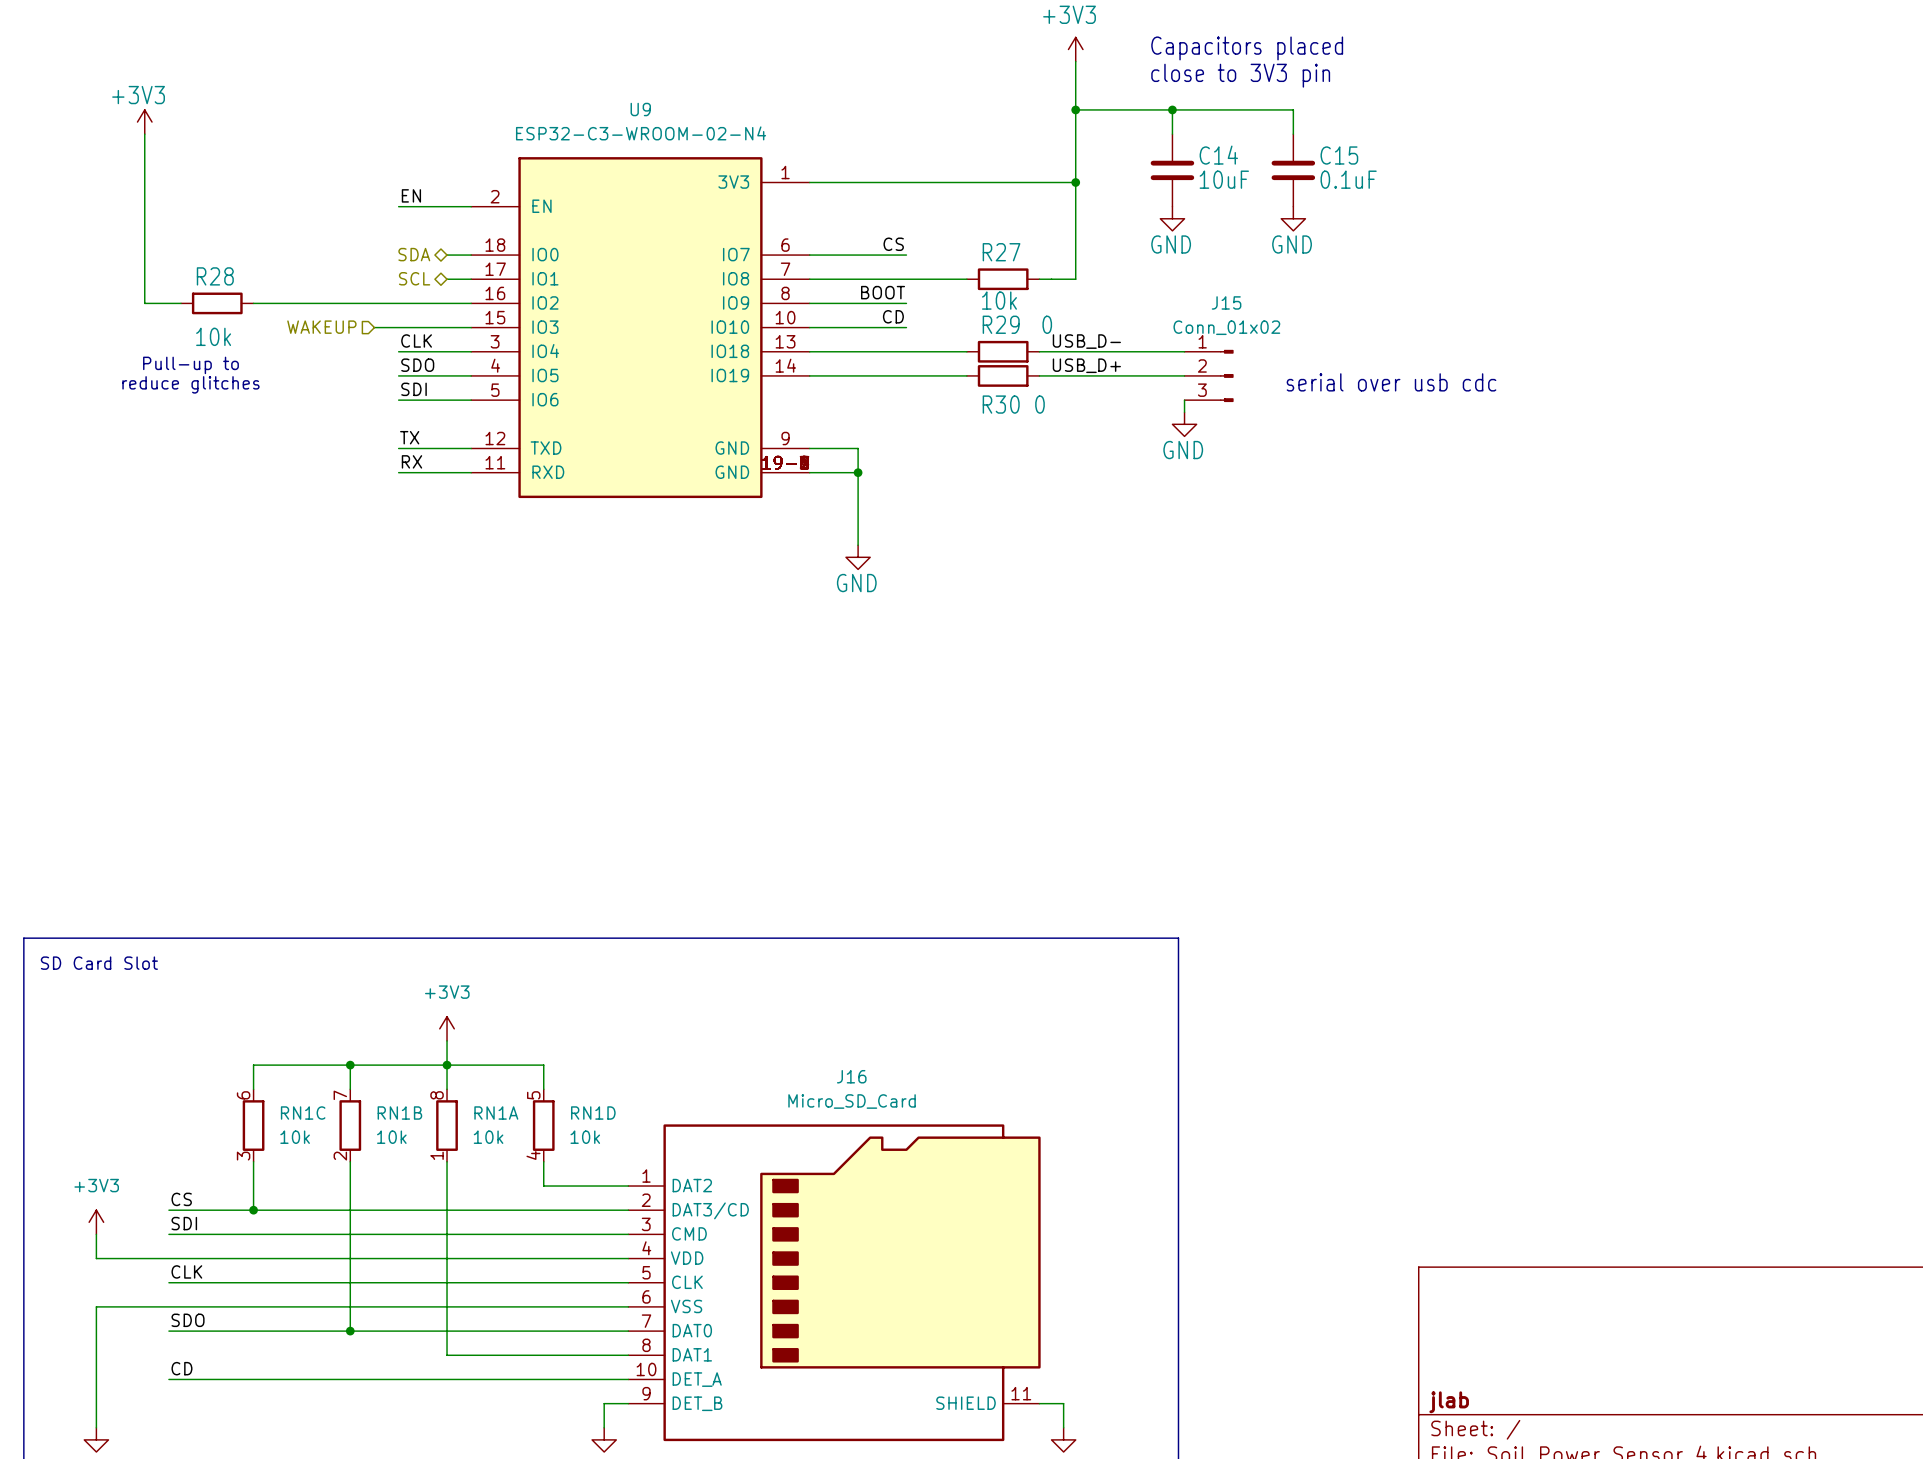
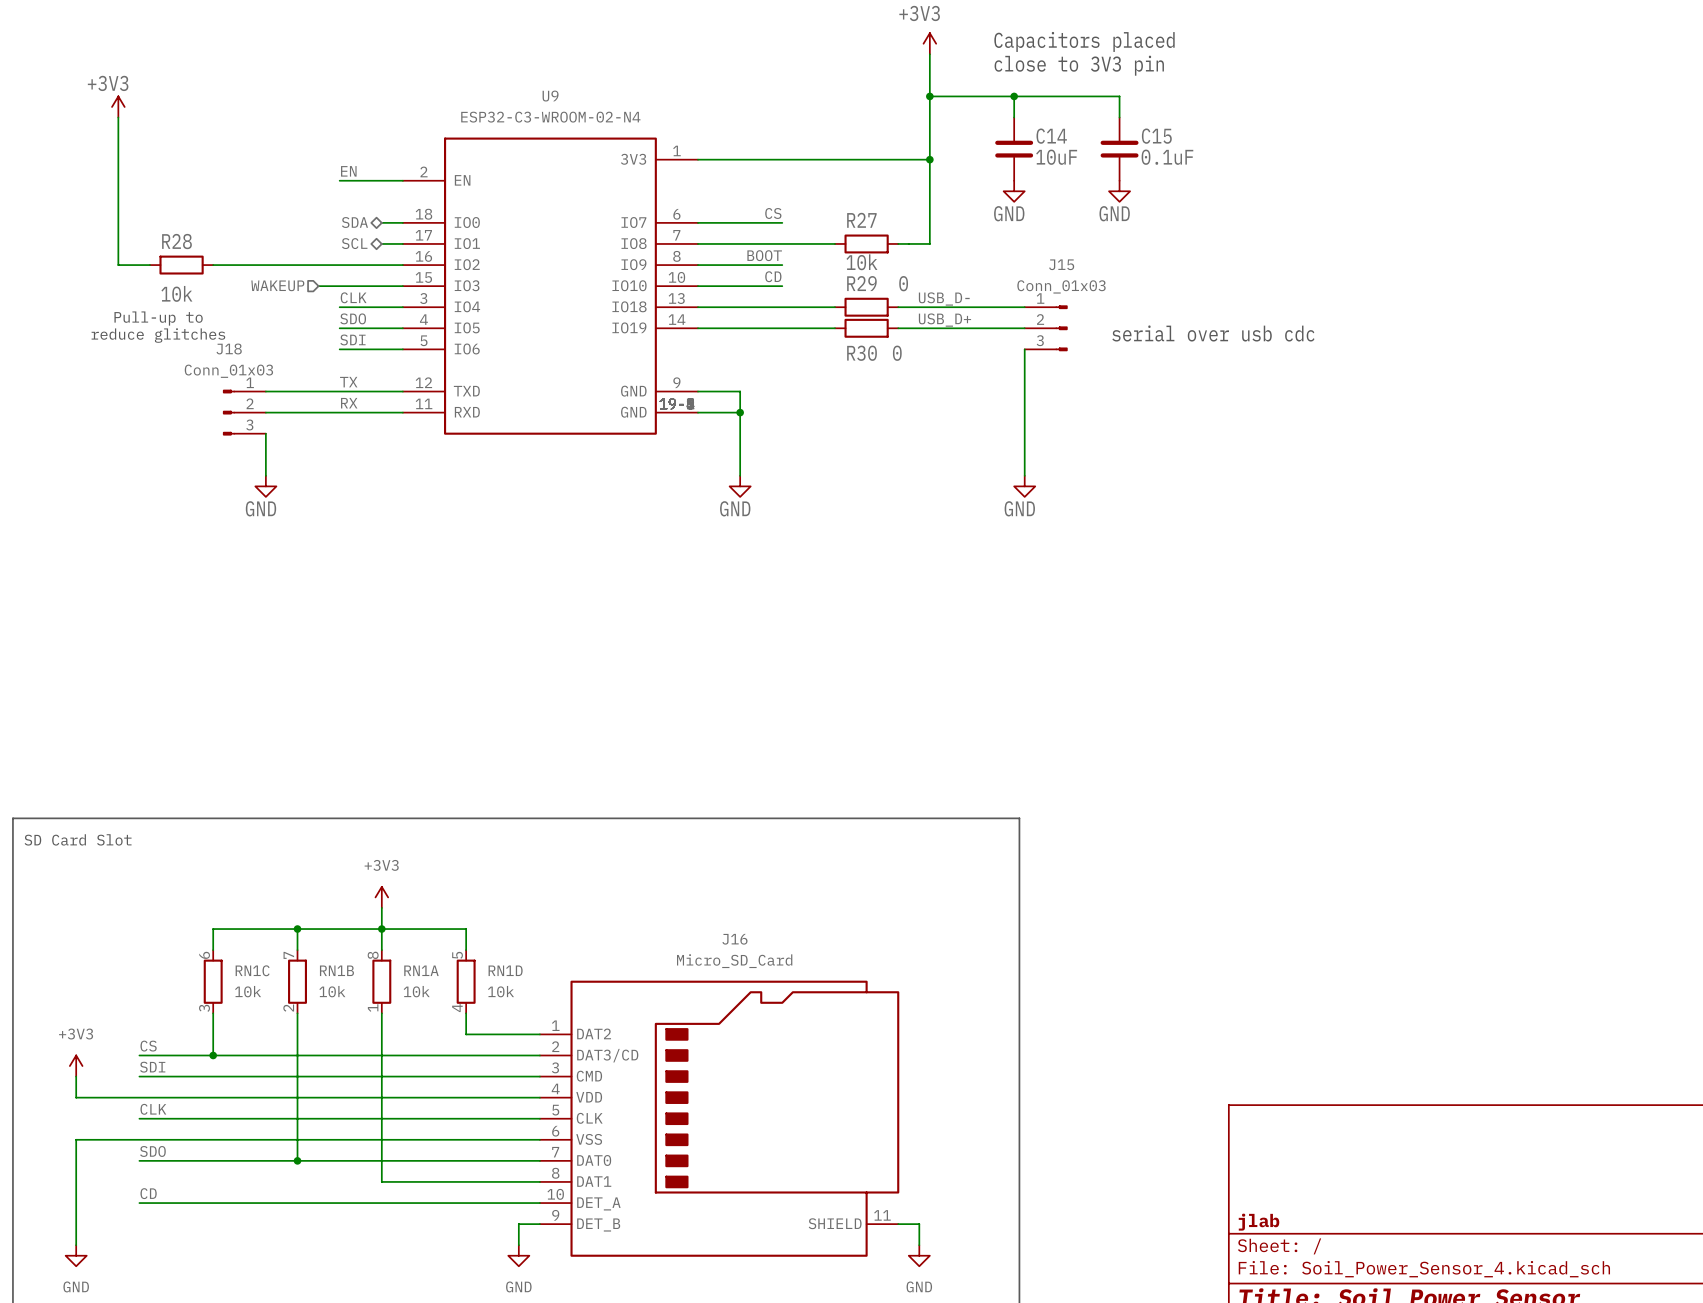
J15 value: Conn_01x02 (1226, 327) -> Conn_01x03 (1061, 286)
wire: none -> (1024, 359) (1024, 475)
power symbol position: GND (1184, 424) -> GND (1024, 486)
wire: none -> (265, 391) (339, 391)
J18: none -> Conn_01x03 (244, 412)
wire: none -> (265, 412) (339, 412)
wire: none -> (265, 433) (265, 475)
power symbol: none -> GND (265, 486)

